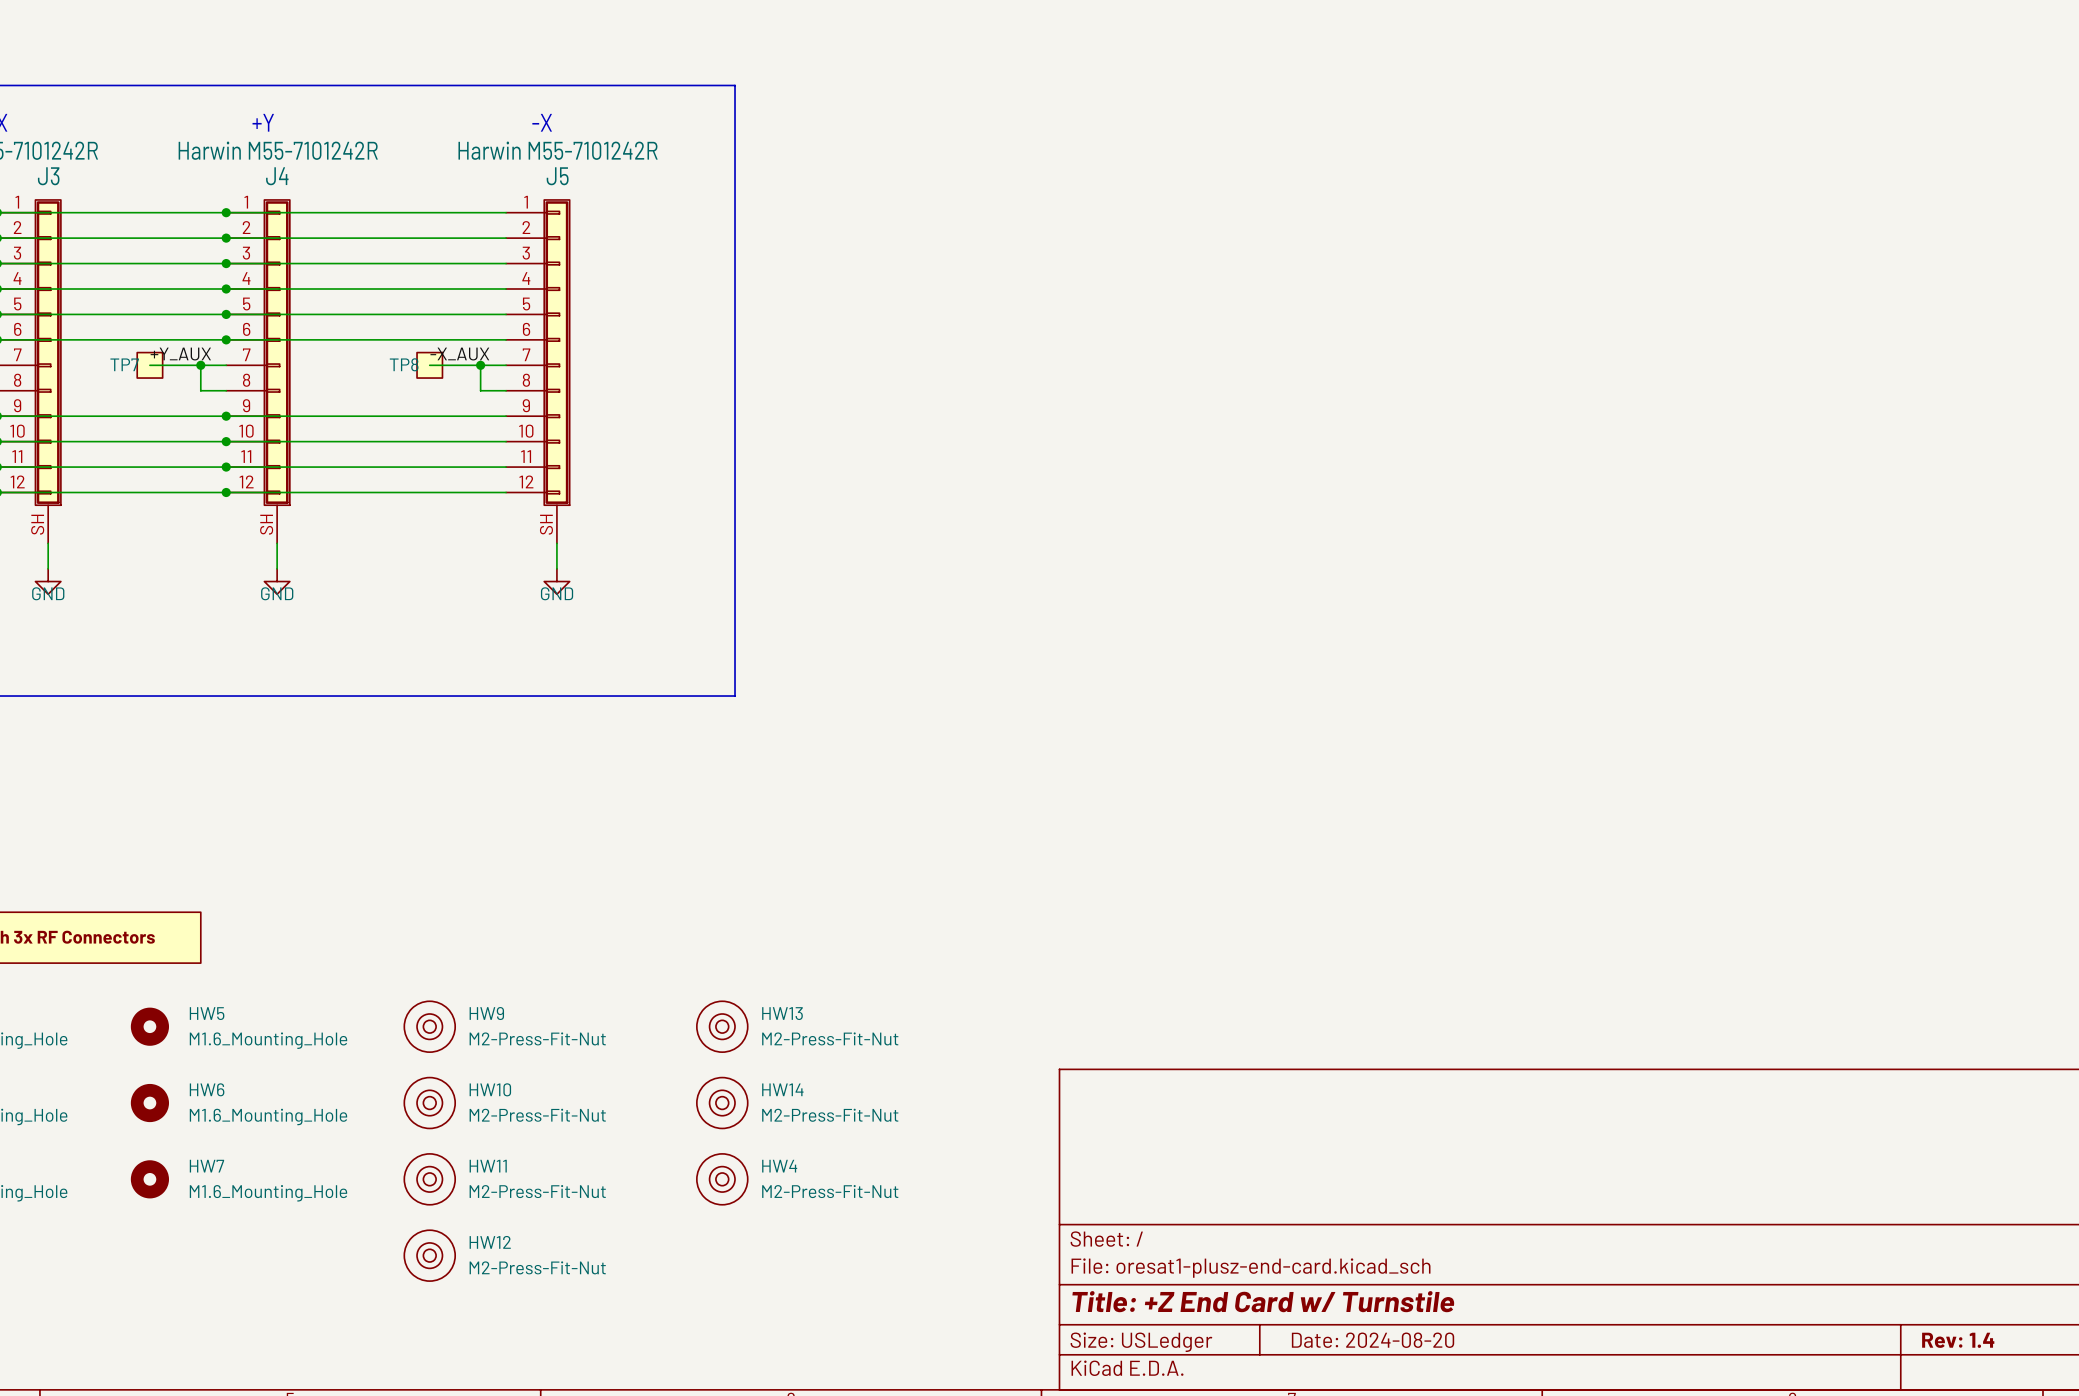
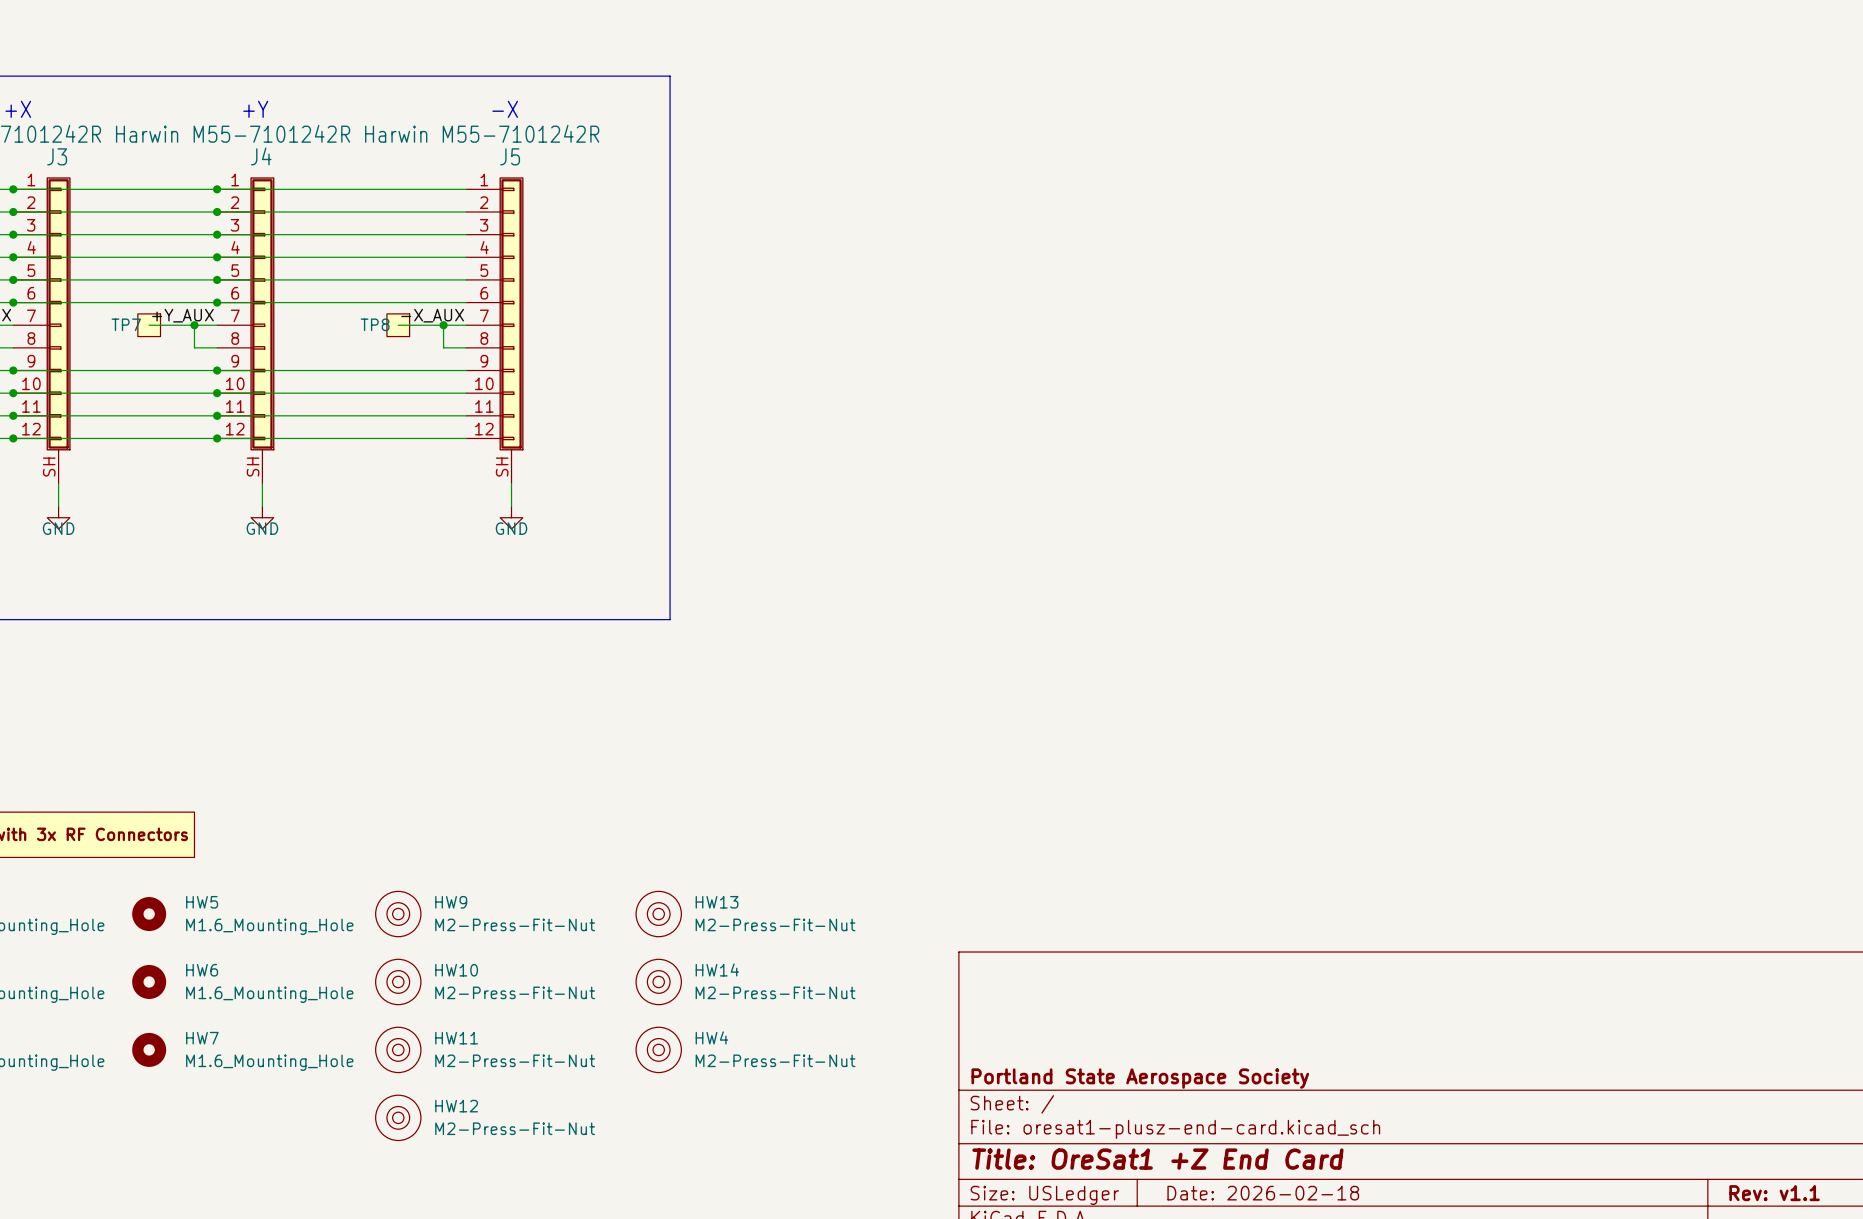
title block: none -> Portland State Aerospace Society (1140, 1078)
title block: Title: +Z End Card w/ Turnstile (1263, 1301) -> Title: OreSat1 +Z End Card (1157, 1159)
title block: Date: 2024-08-20 (1373, 1340) -> Date: 2026-02-18 (1263, 1193)
title block: Rev: 1.4 (1958, 1340) -> Rev: v1.1 (1774, 1193)

